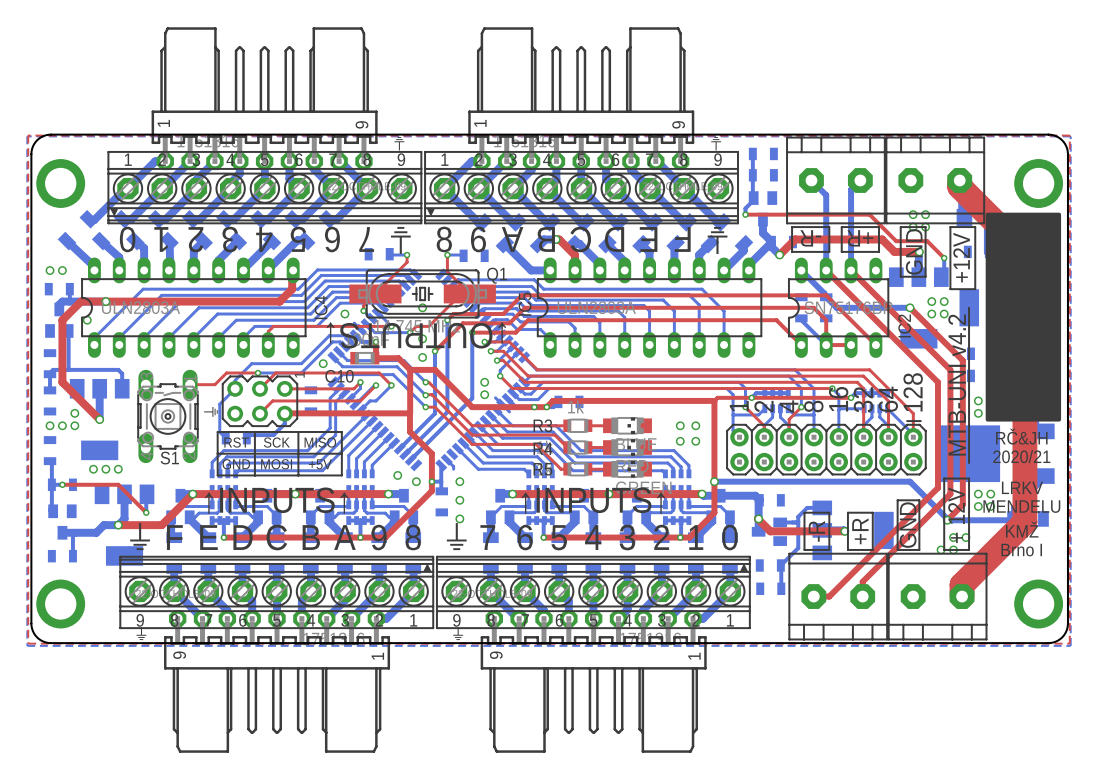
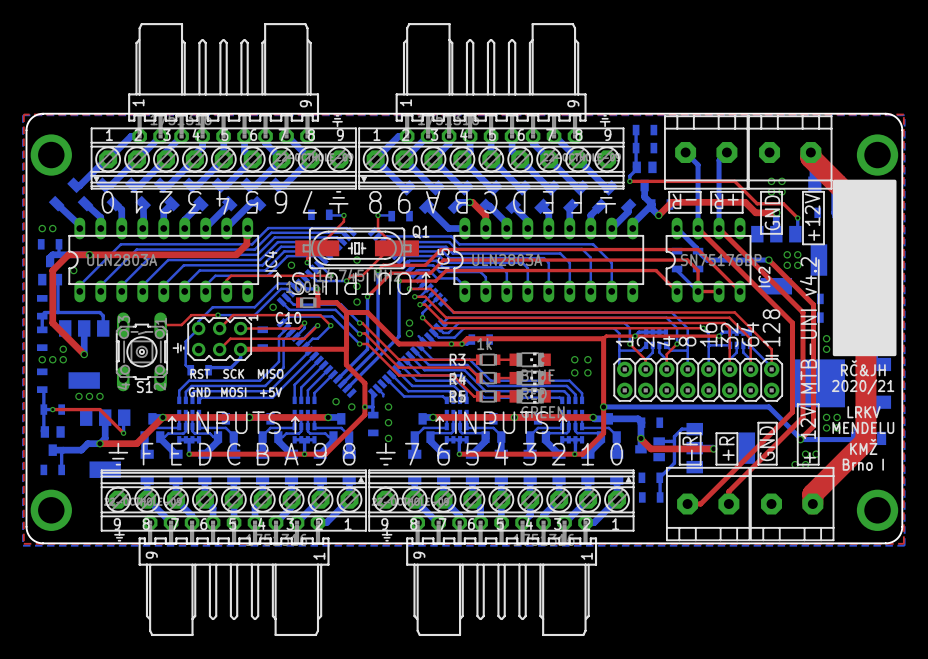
line: (217, 431) (217, 475) (341, 475) (341, 431) (217, 431) -> none
line: (254, 431) (254, 475) -> none
line: (298, 431) (298, 475) -> none
line: (217, 453) (341, 453) -> none

